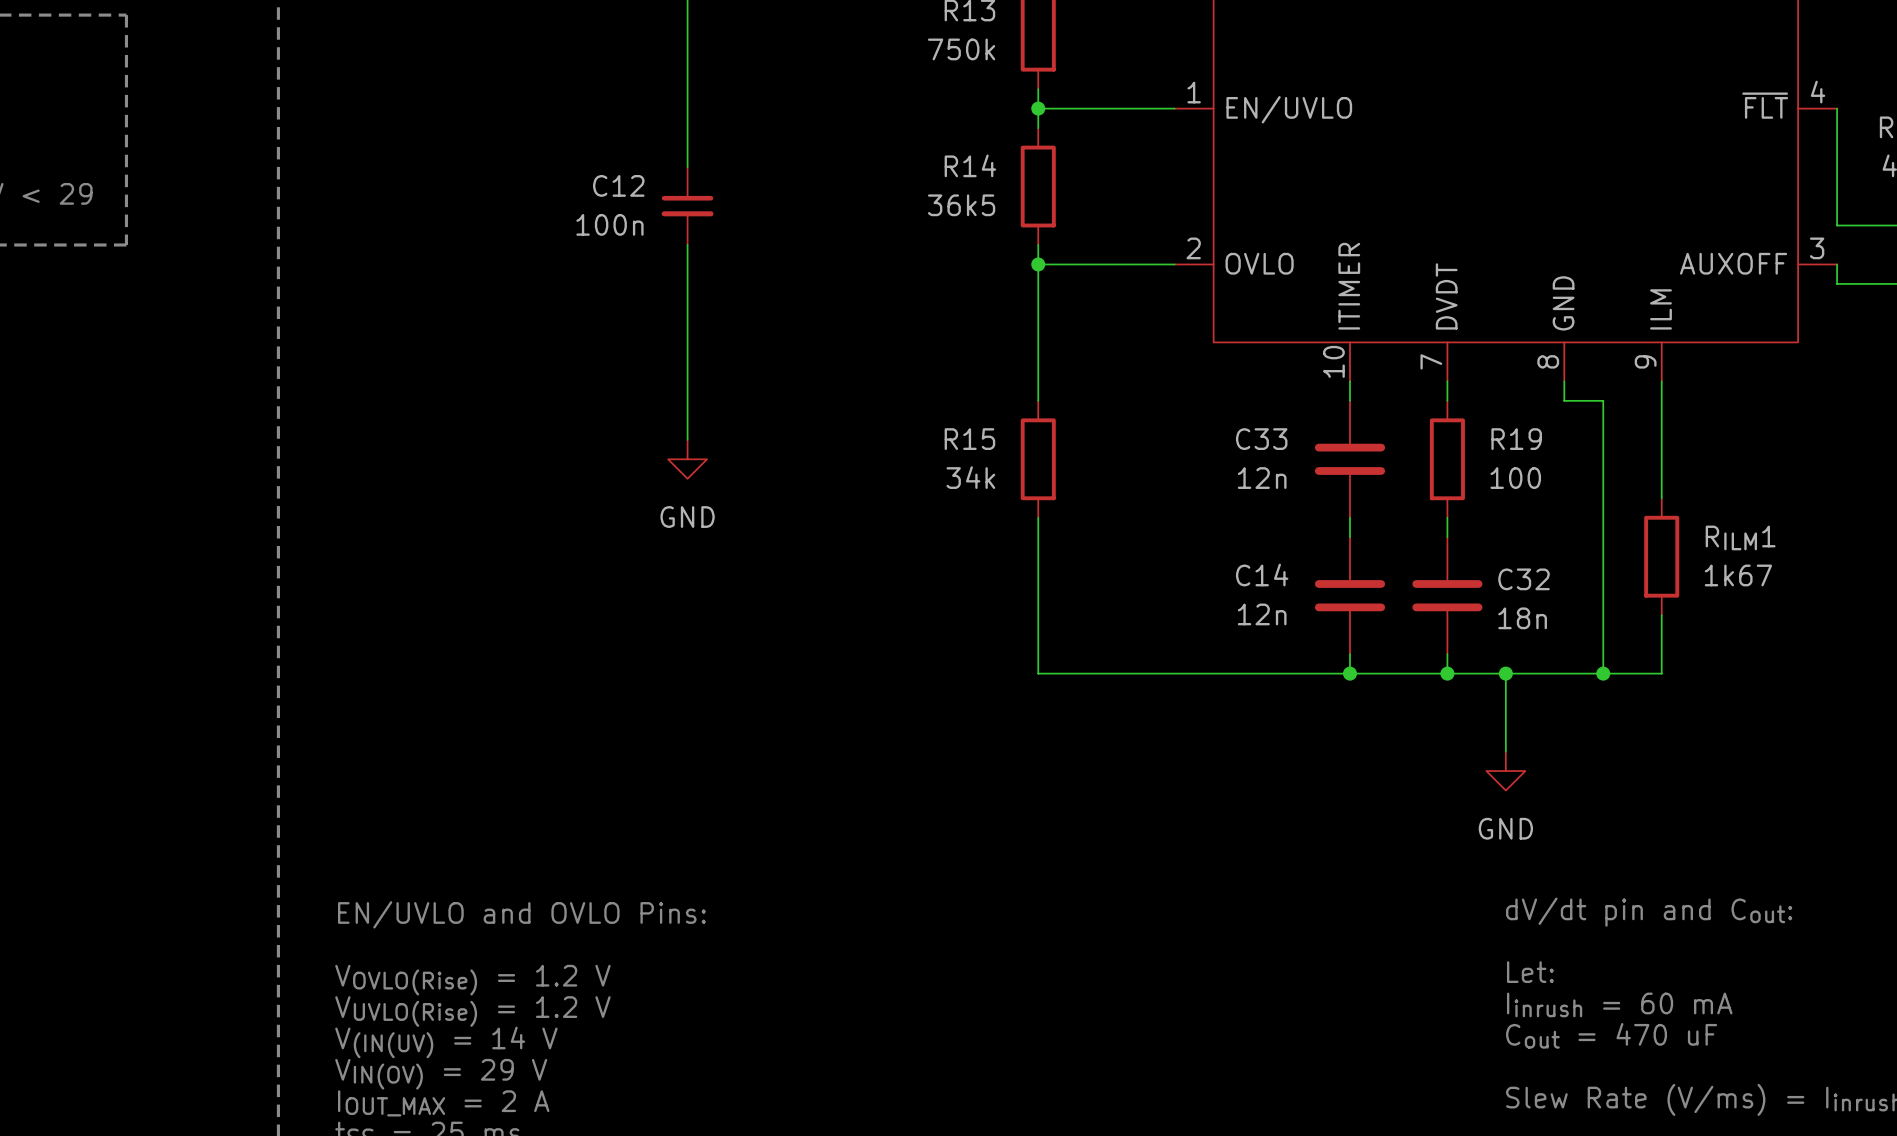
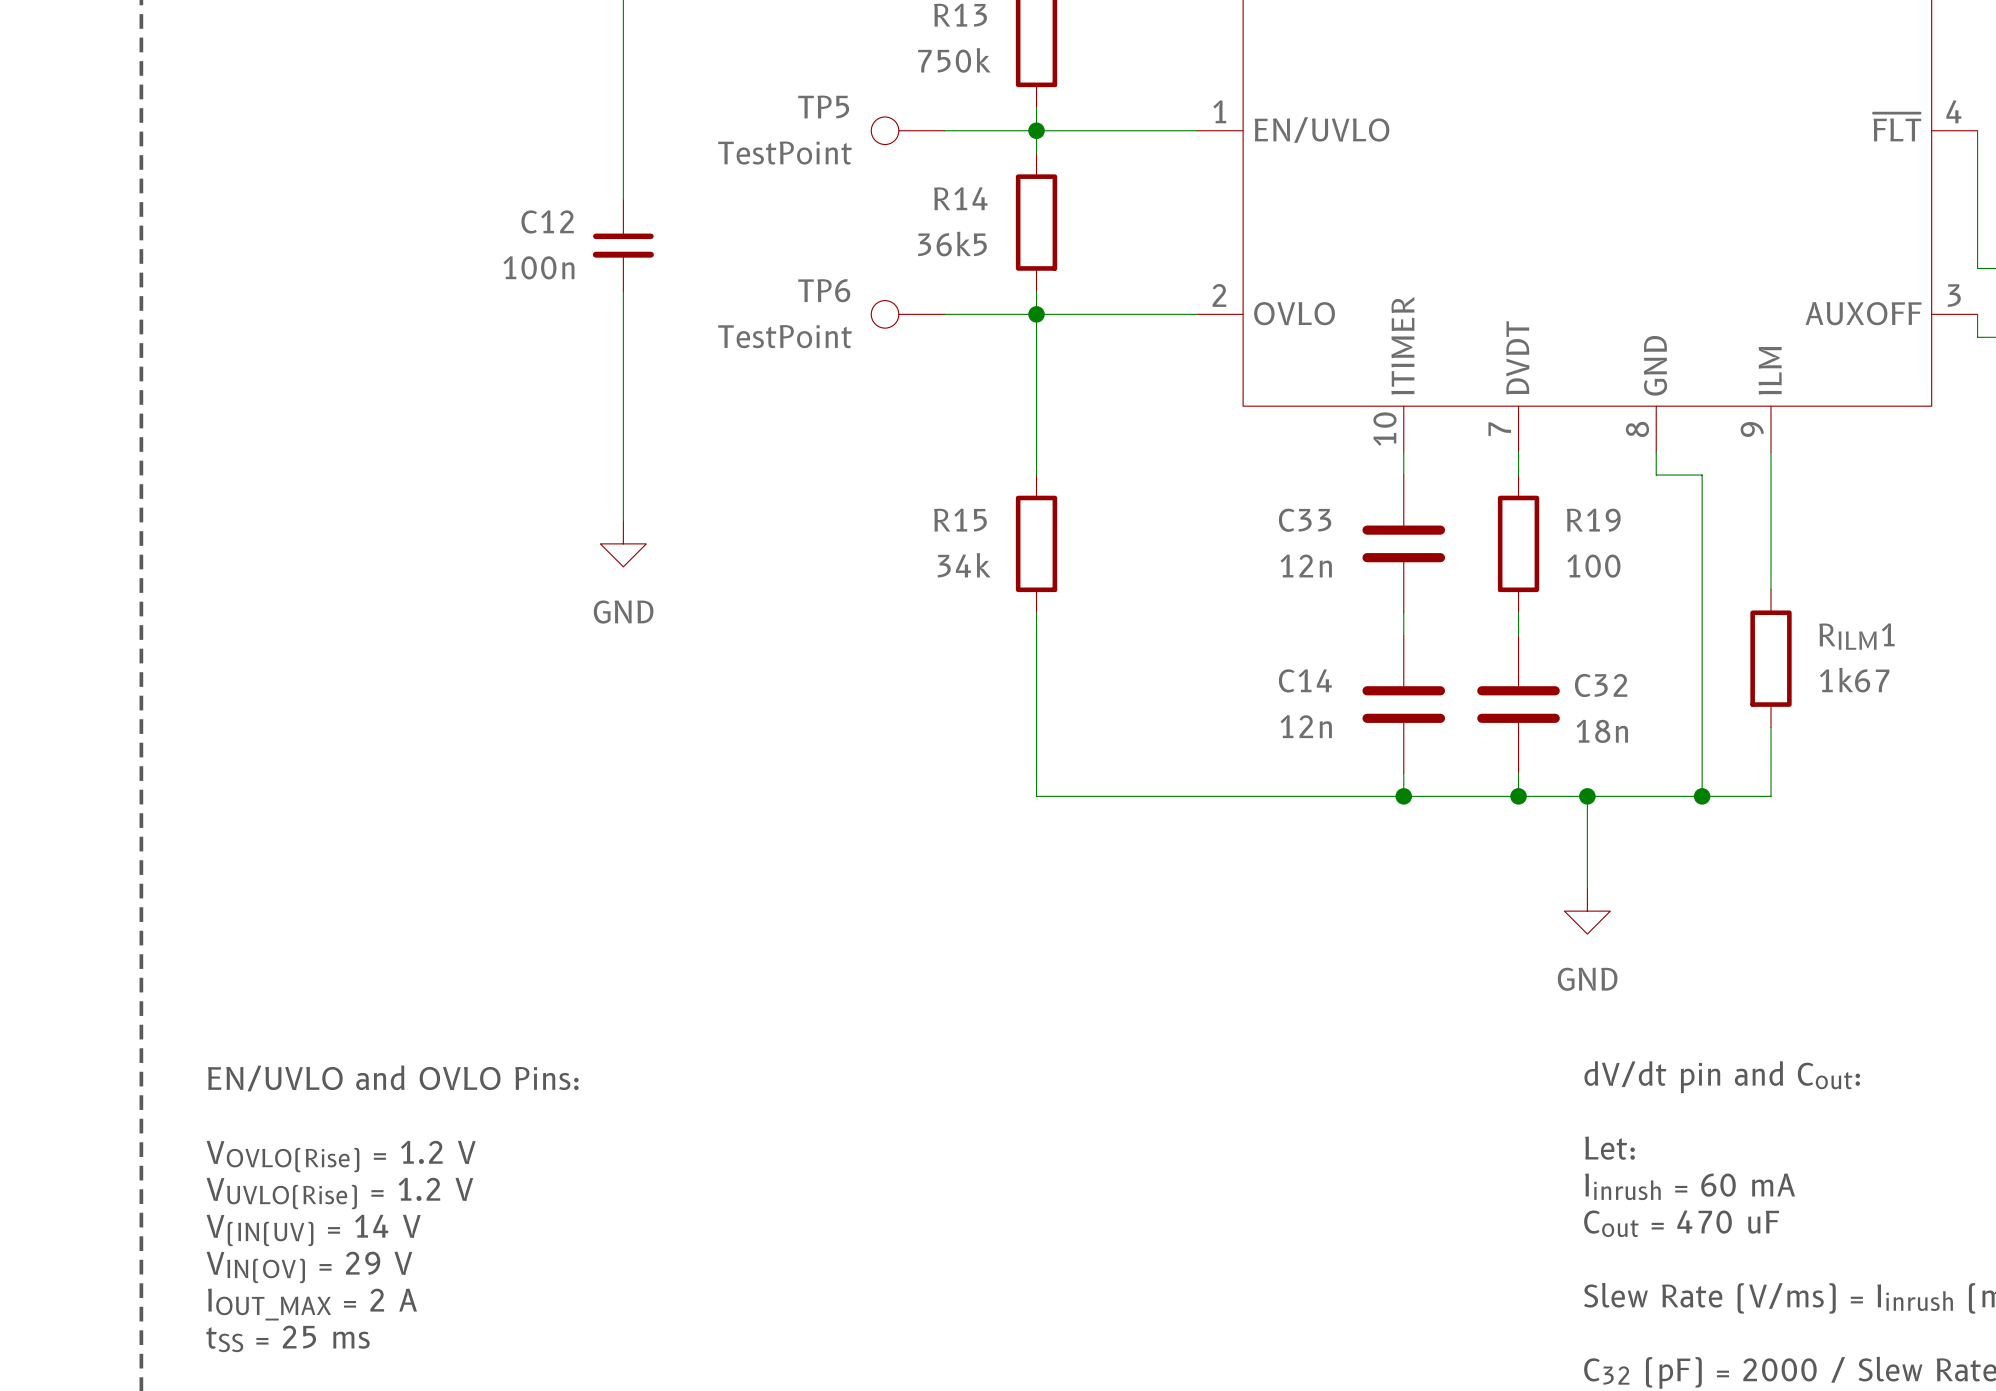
TP5: none -> TestPoint (907, 130)
wire: none -> (944, 130) (1036, 130)
TP6: none -> TestPoint (907, 314)
wire: none -> (944, 314) (1036, 314)

